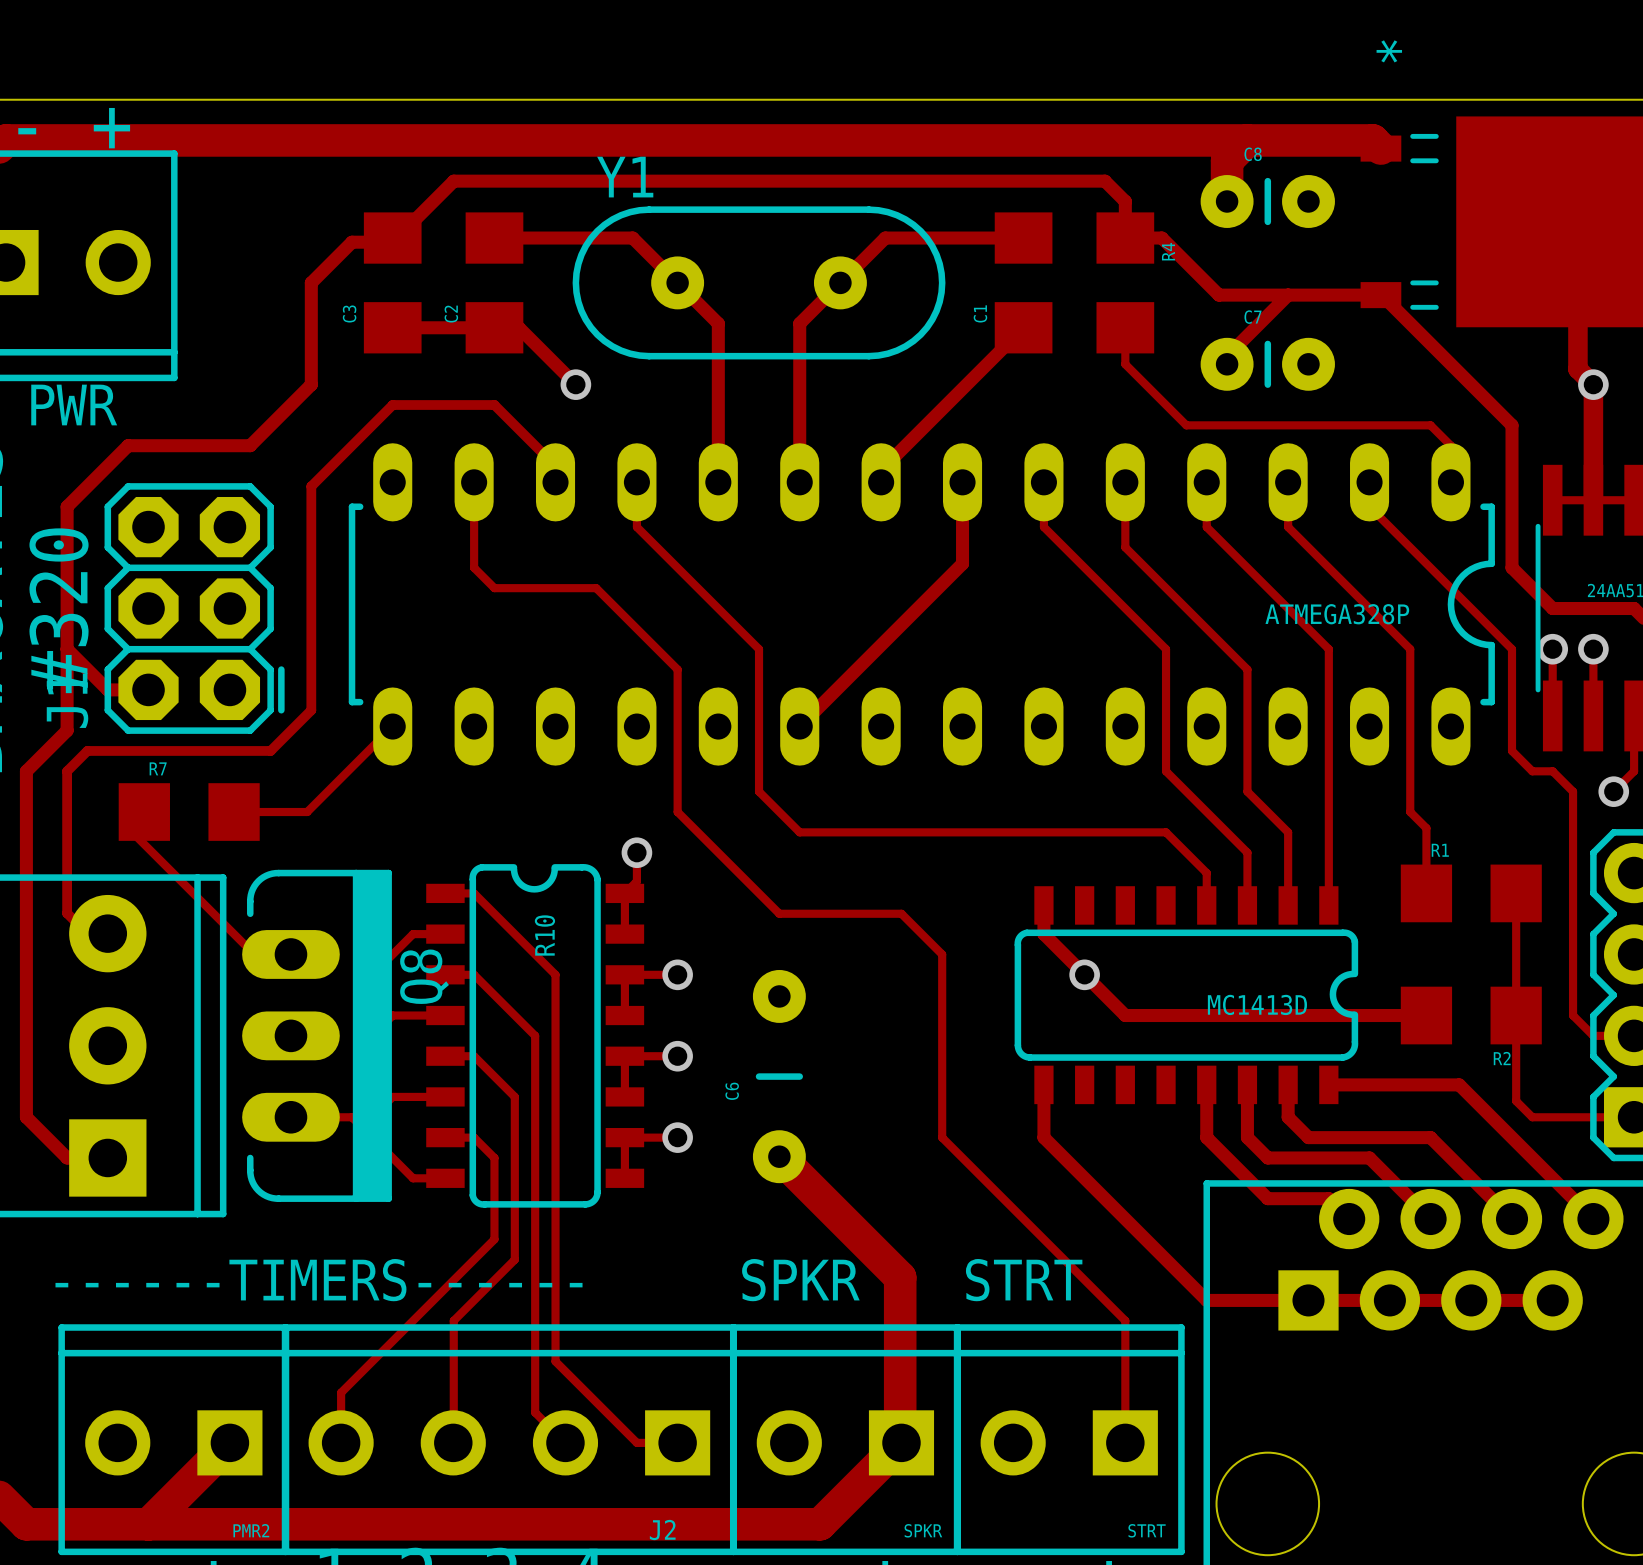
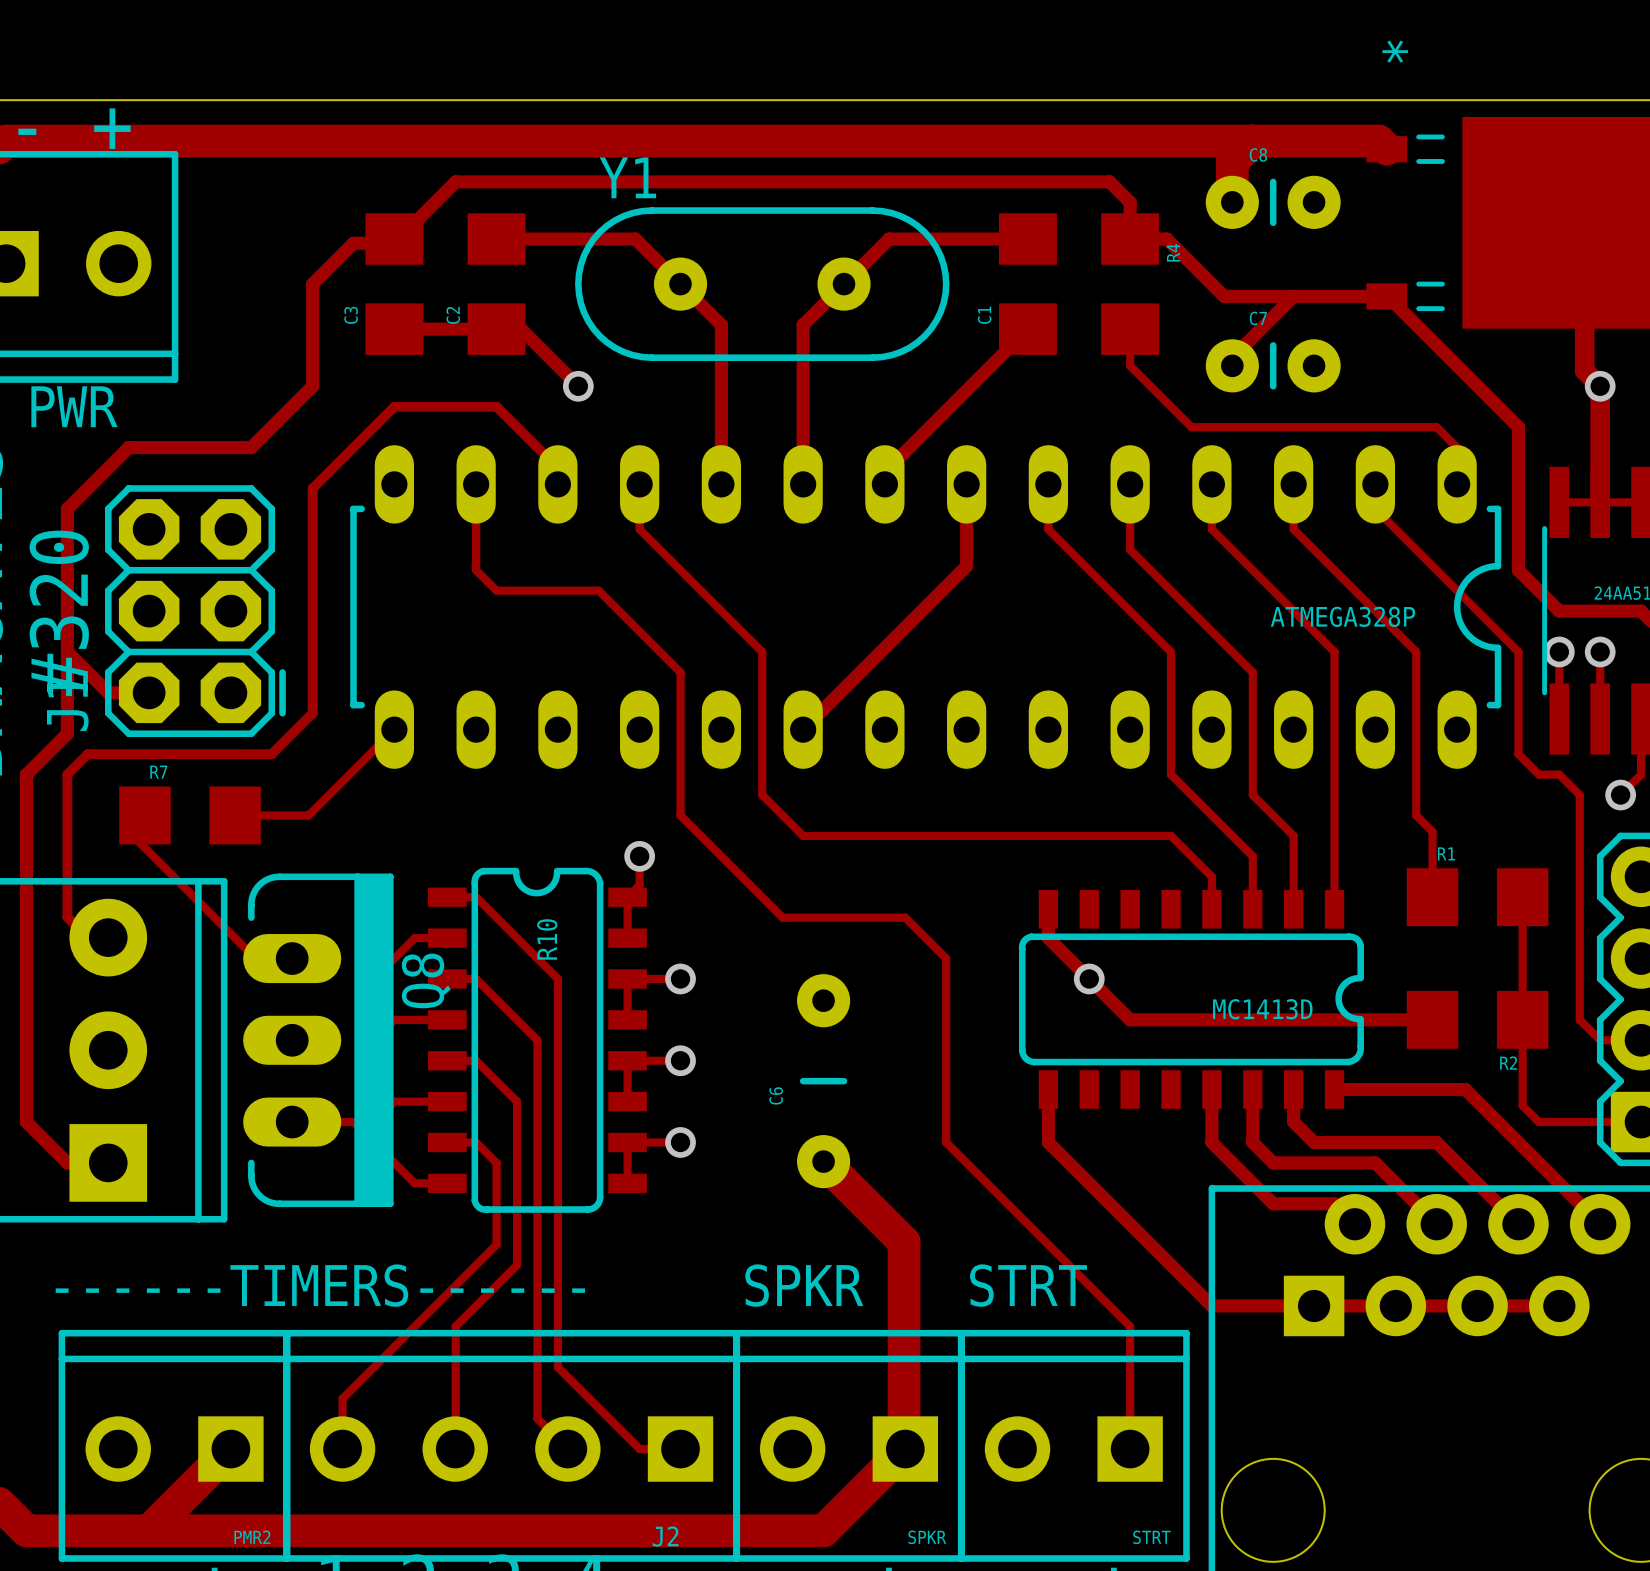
C6 position: (779, 1076) -> (823, 1081)
track: (779, 1156) (900, 1277) -> (823, 1161) (904, 1242) (904, 1282)

